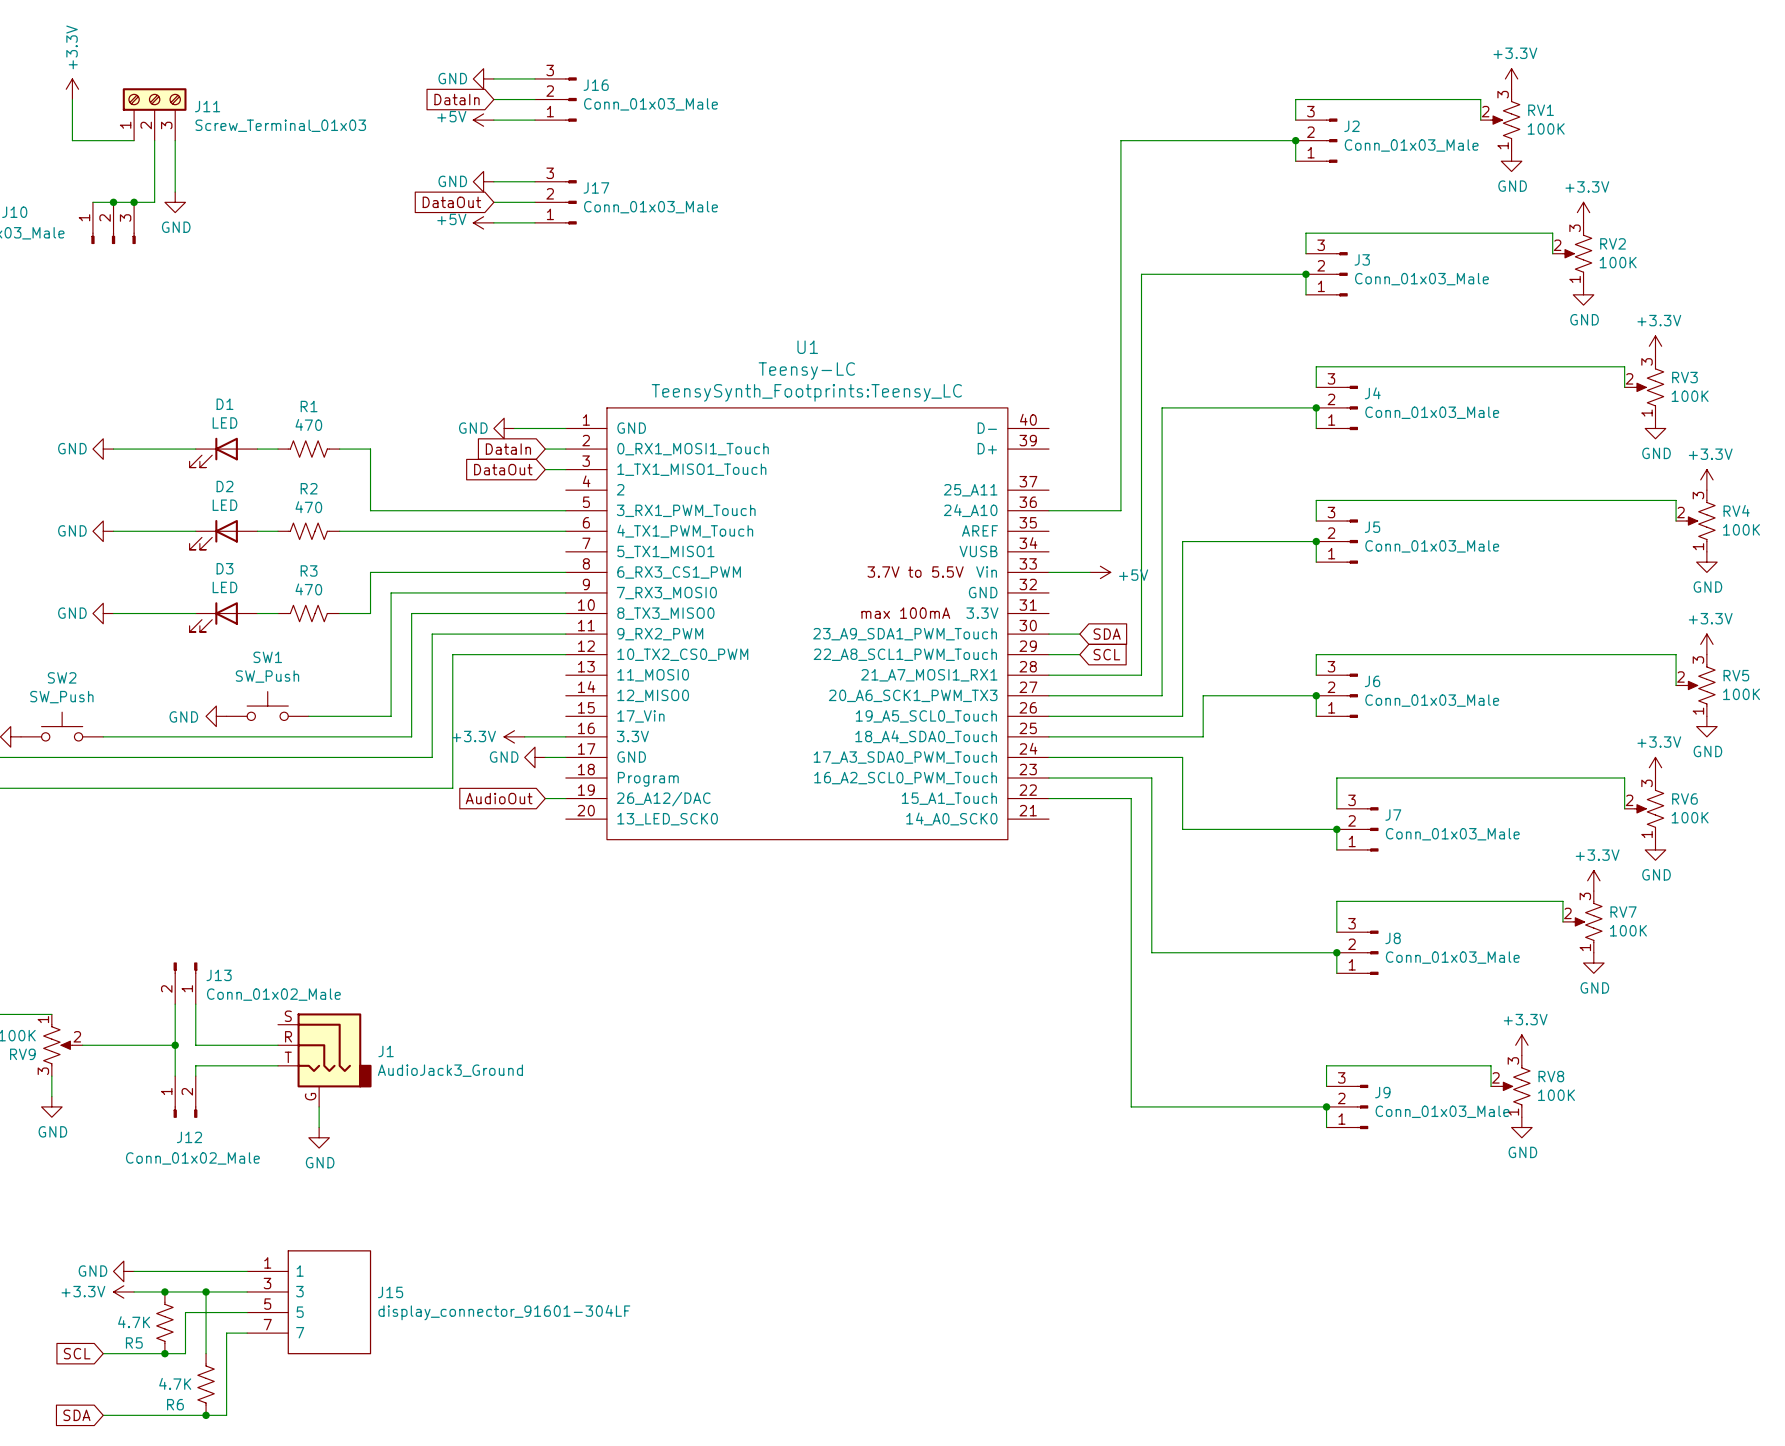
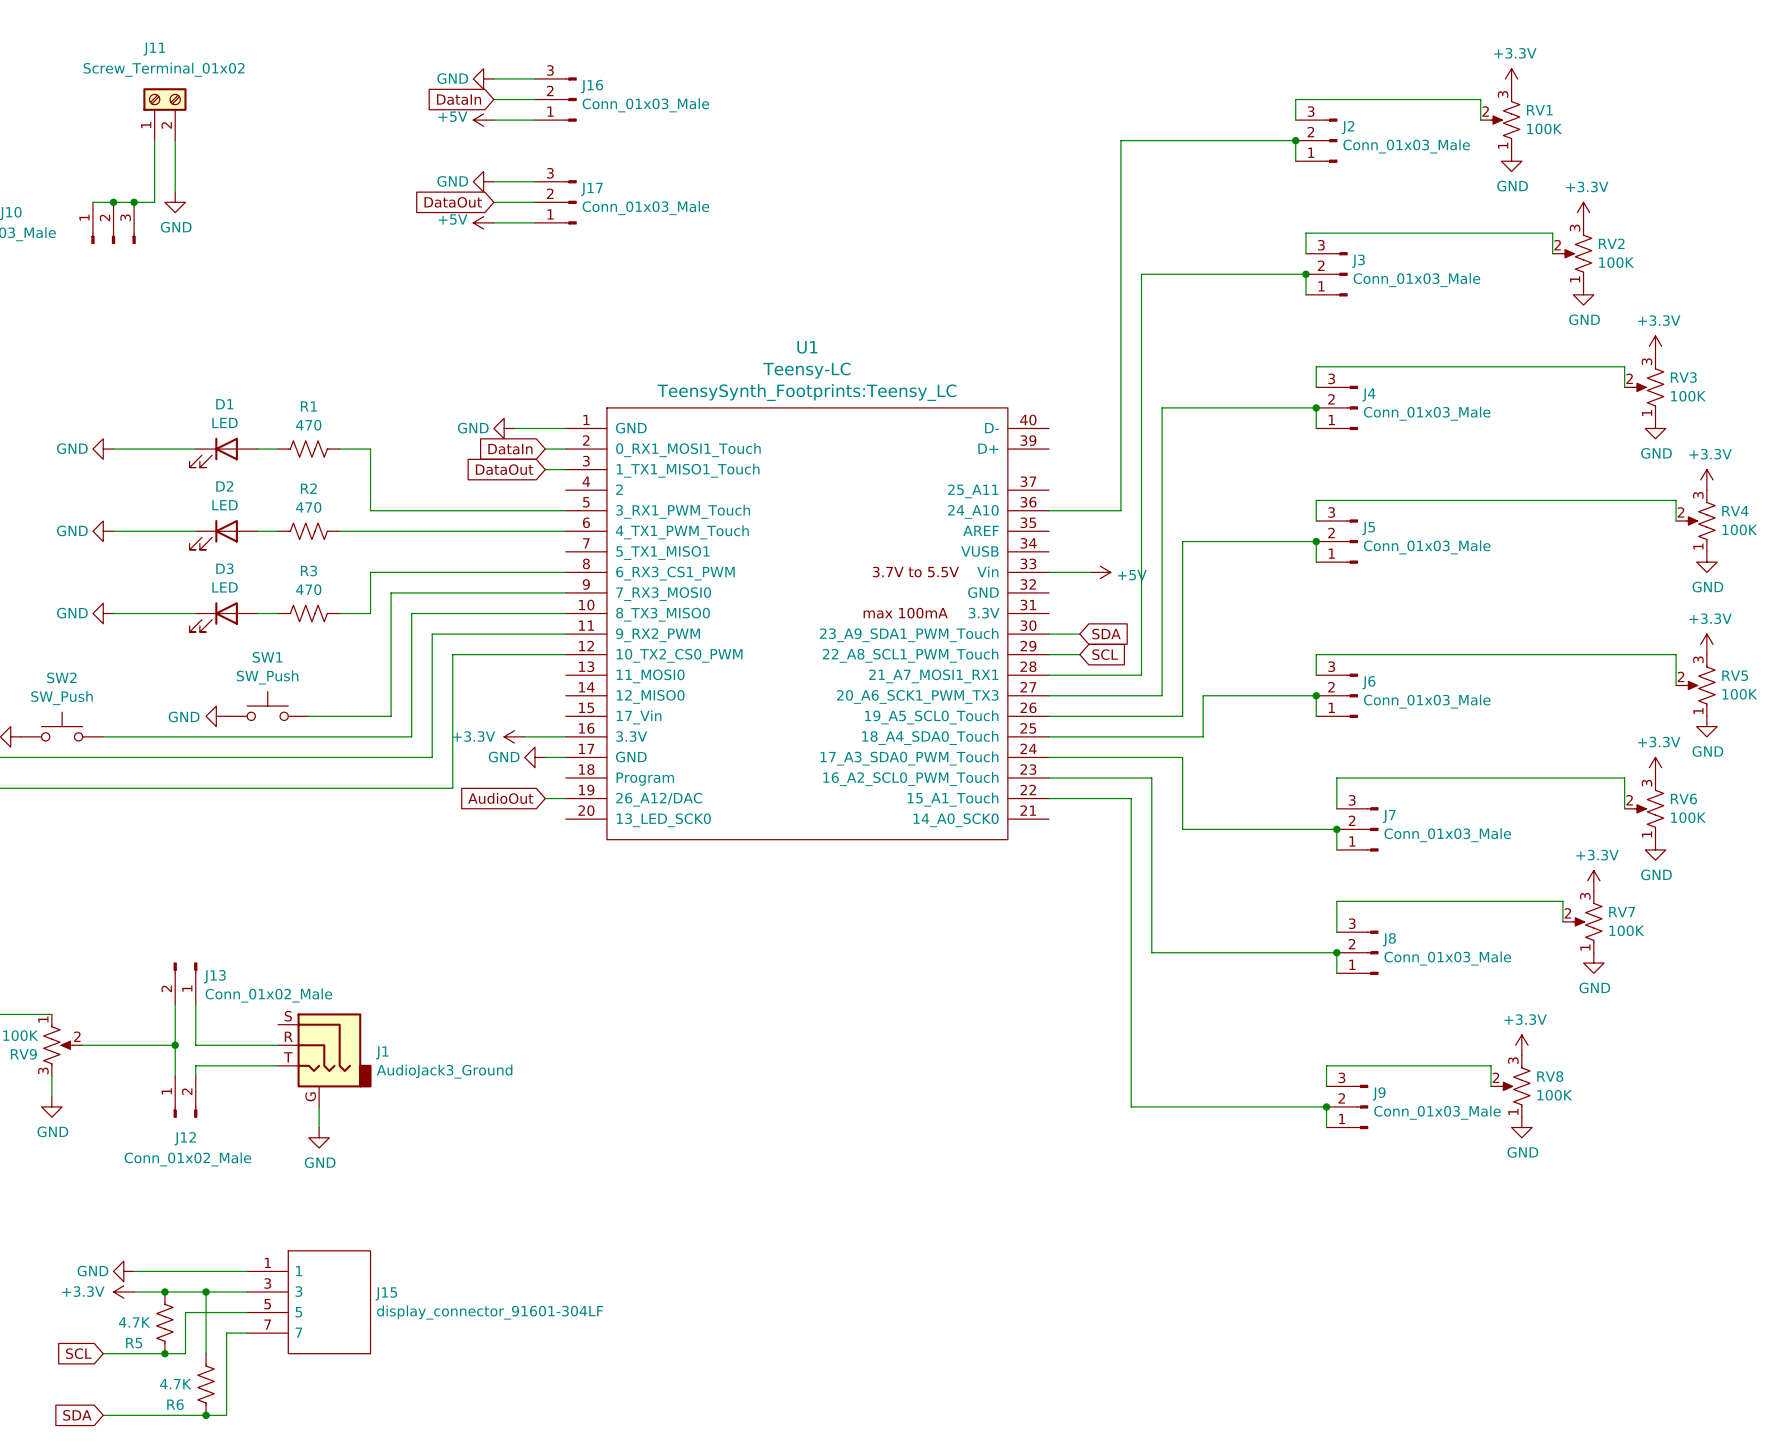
J11 symbol: [122, 88, 187, 141] -> [143, 88, 187, 141]
power symbol: +3.3V (72, 89) -> none
wire: (72, 99) (72, 140) (134, 140) -> none
J11 name position: J11 (207, 106) -> J11 (154, 49)
J11 value: Screw_Terminal_01x03 (280, 125) -> Screw_Terminal_01x02 (164, 69)

